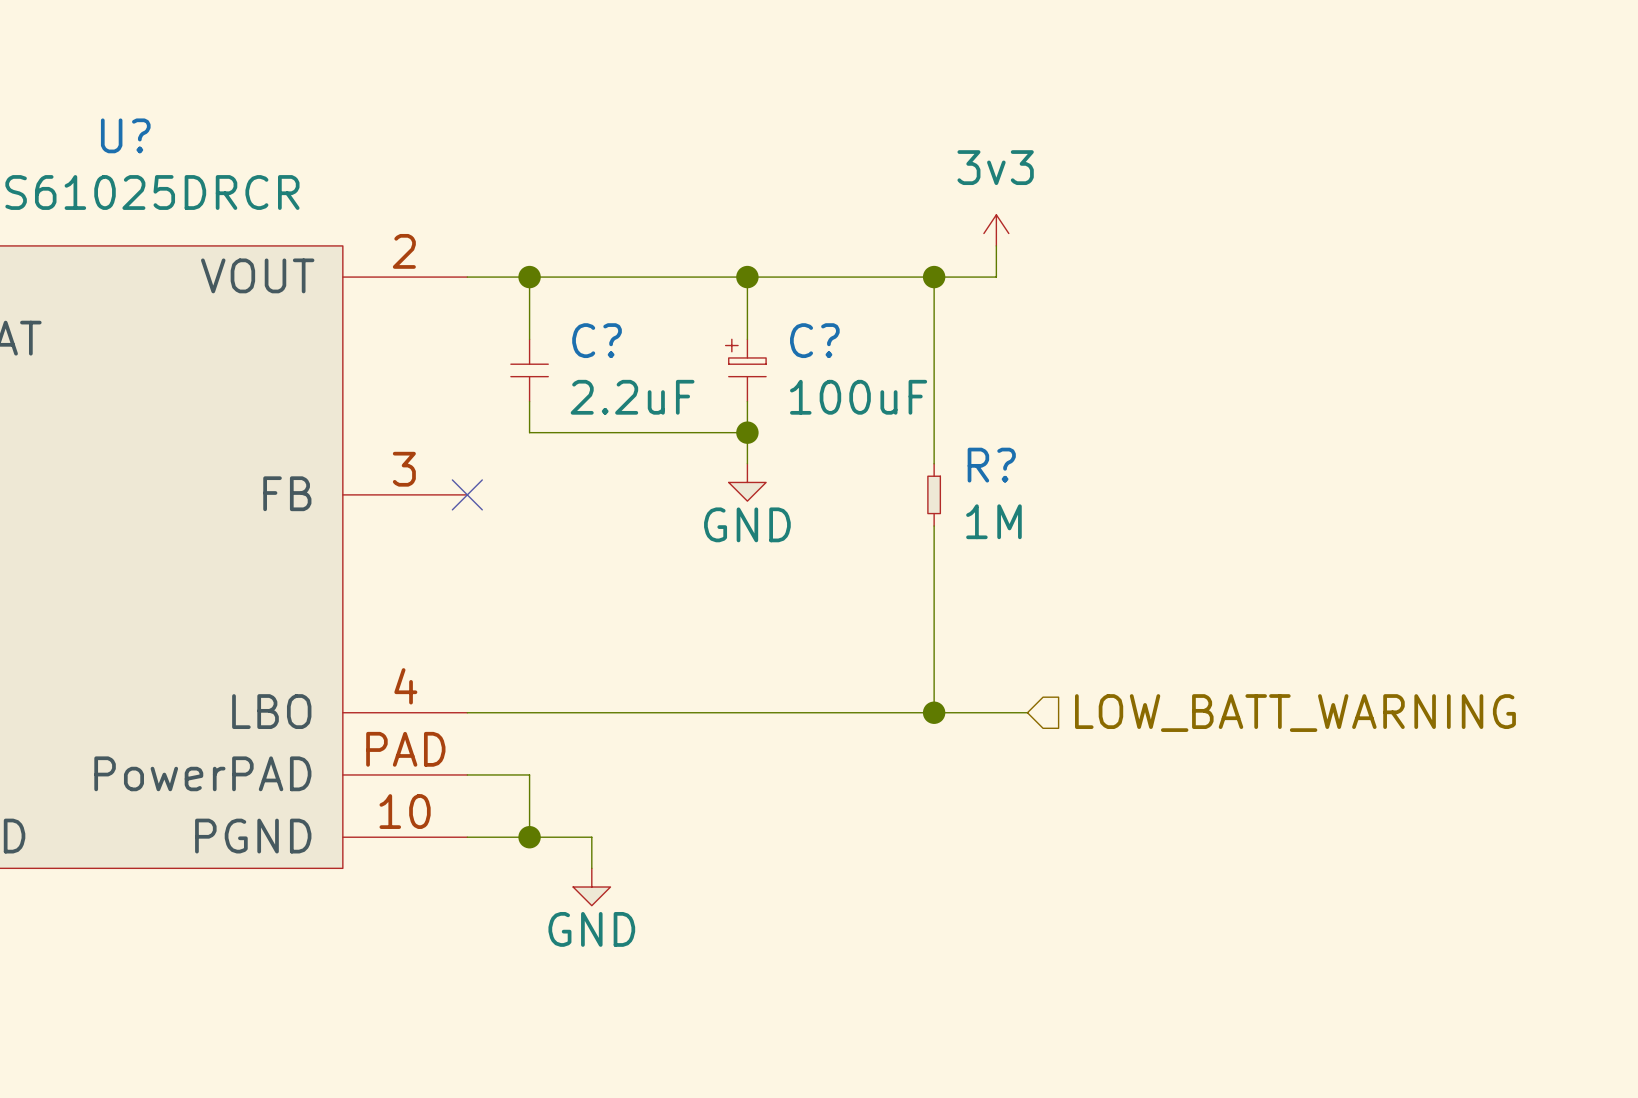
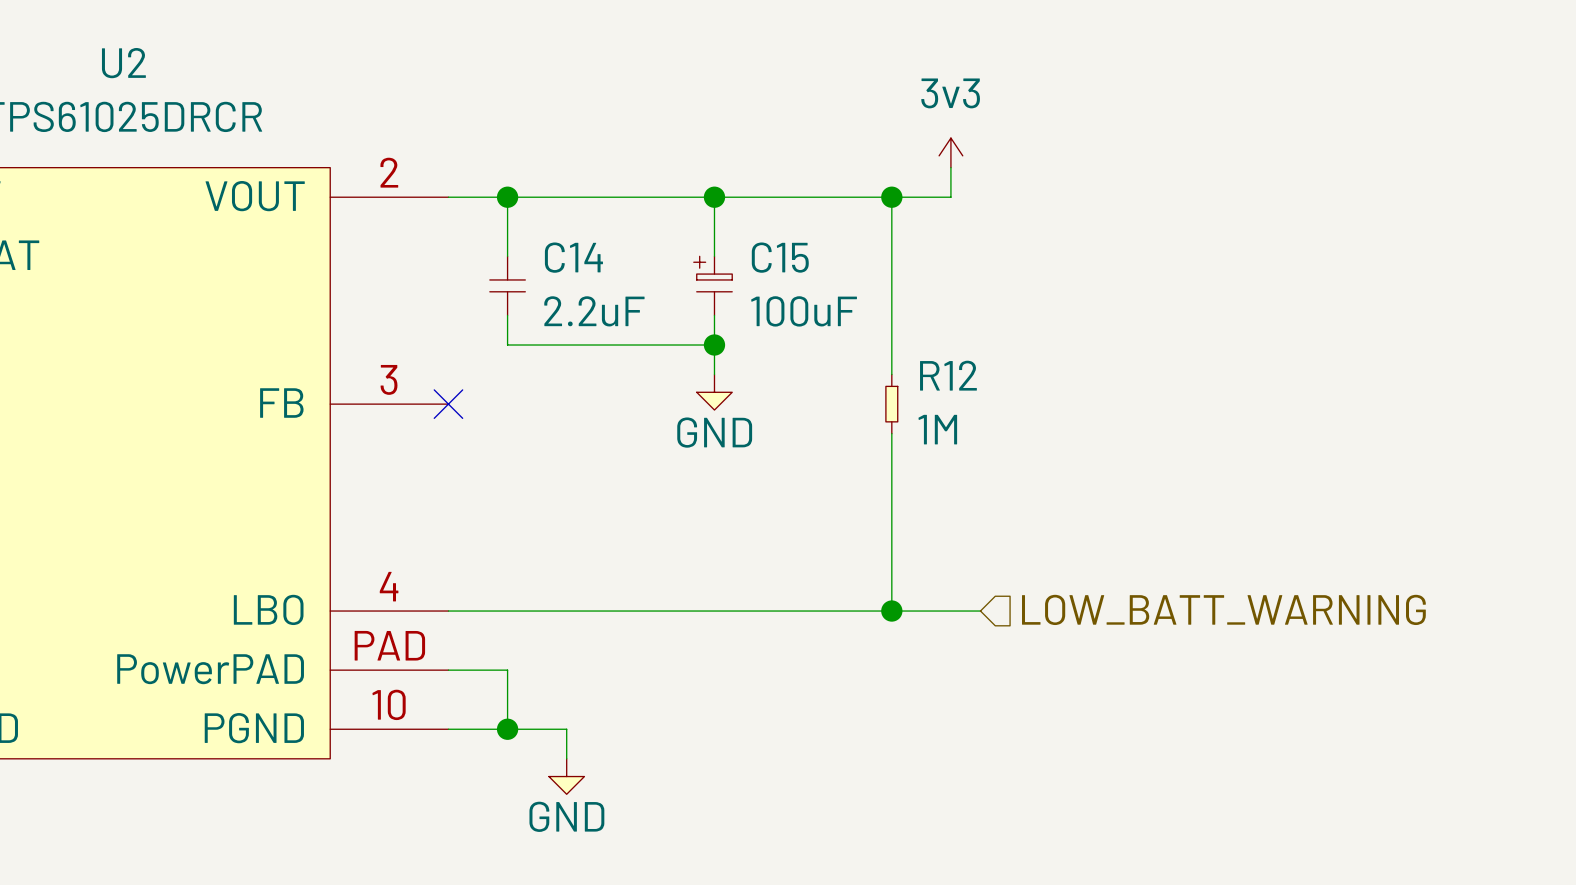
U? name: U? (125, 135) -> U2 (123, 63)
C? name: C? (597, 340) -> C14 (573, 257)
C? name: C? (814, 340) -> C15 (780, 257)
R? name: R? (991, 465) -> R12 (948, 375)

